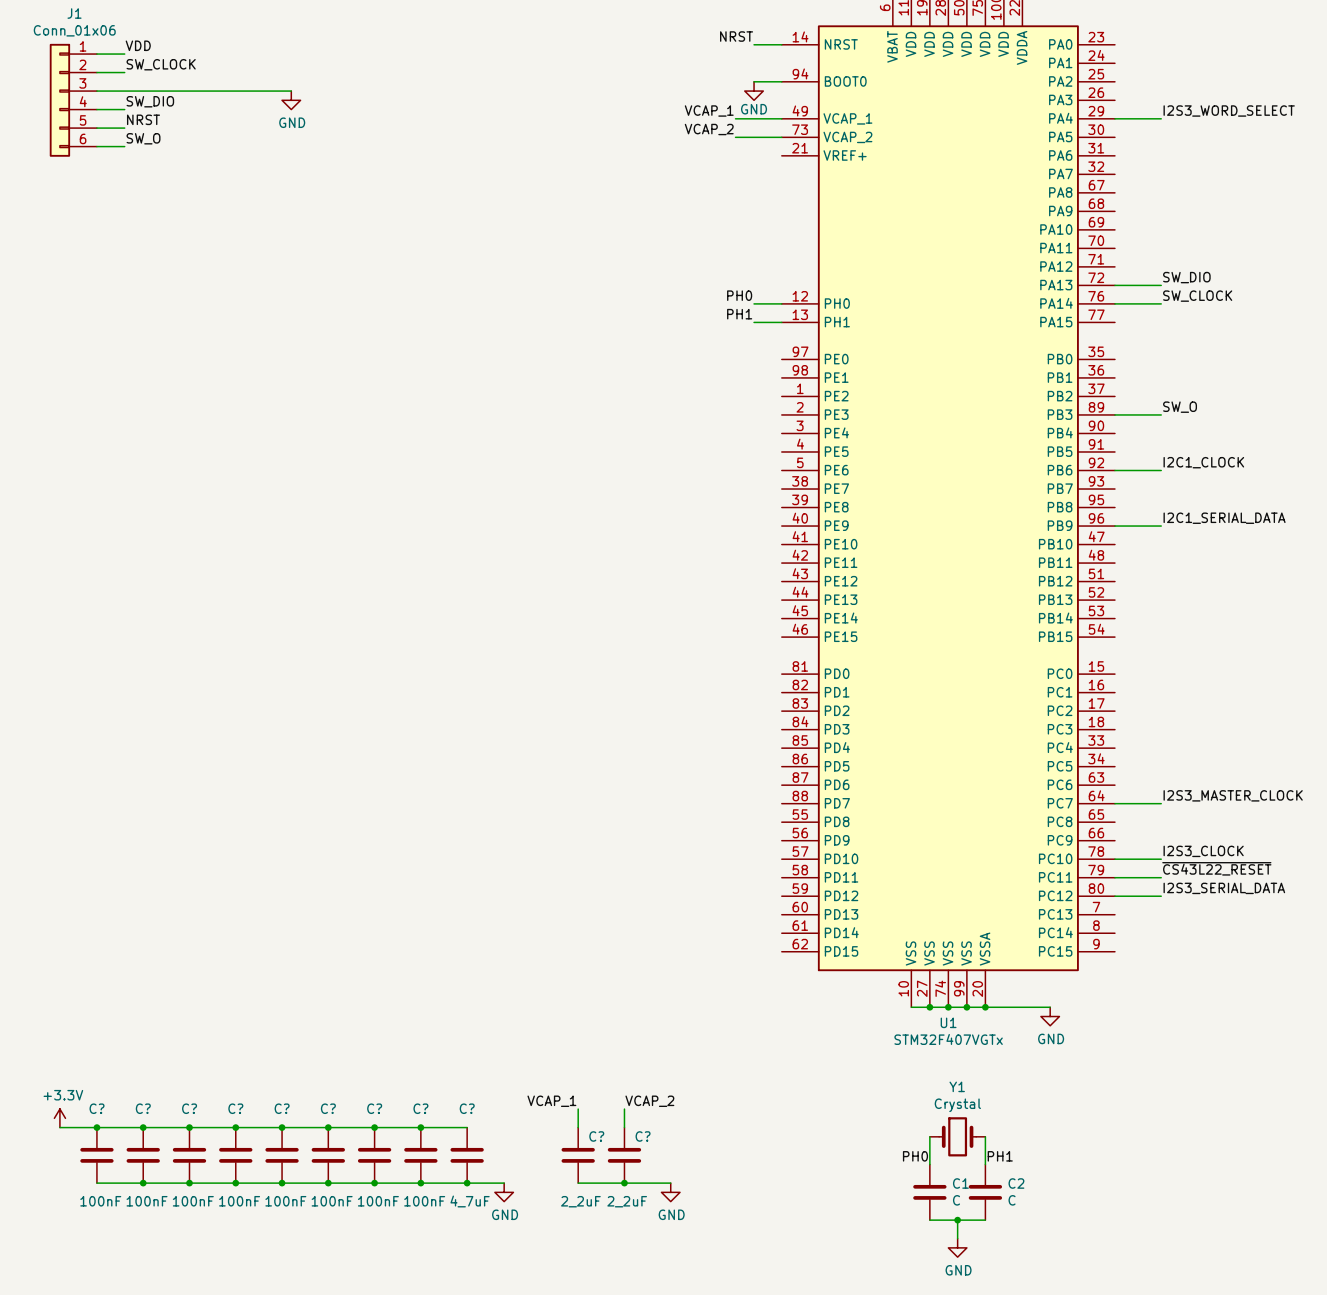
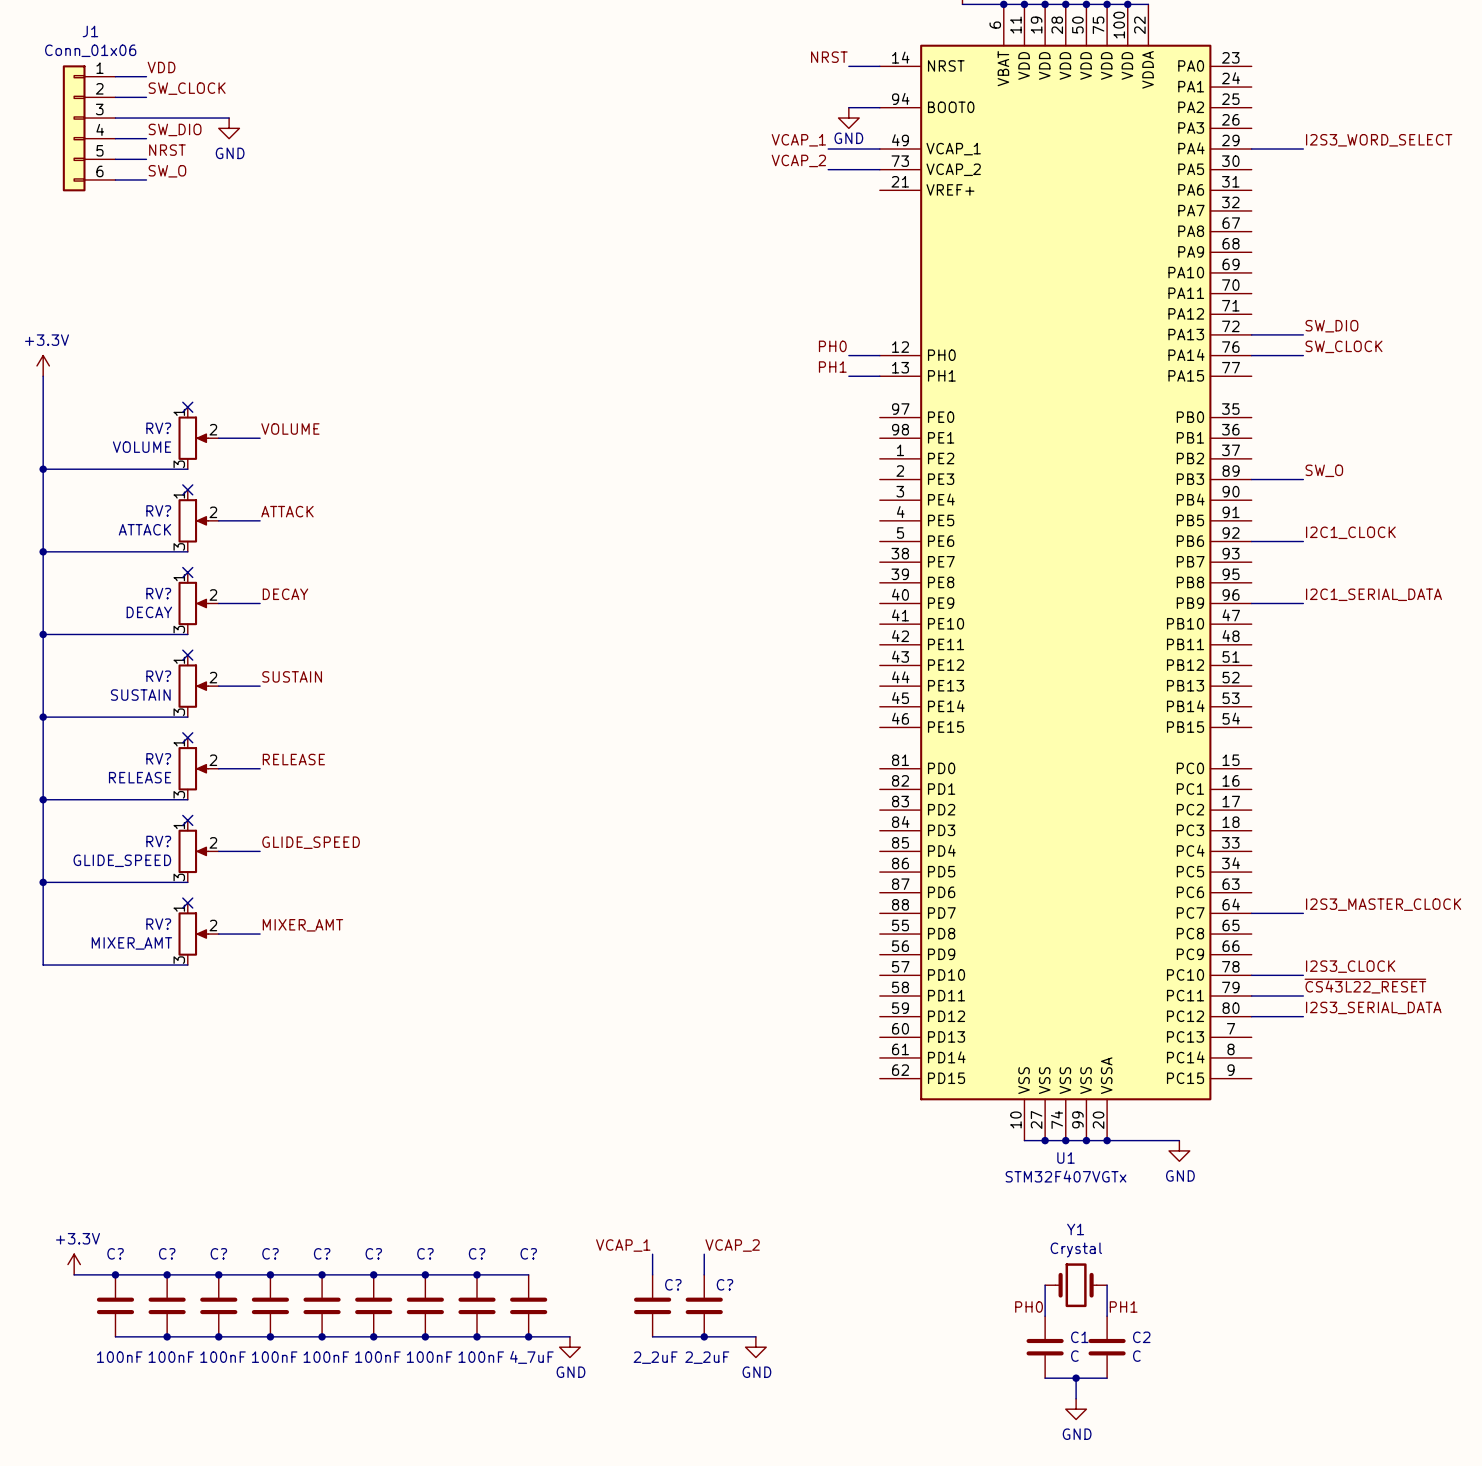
wire: (198, 91) (291, 91) -> none
power symbol position: GND (291, 100) -> GND (229, 128)
power symbol: none -> +3.3V (43, 365)
wire: none -> (43, 376) (43, 965) (187, 965)
no-connect mark: none -> (187, 407)
label: none -> VOLUME (290, 429)
RV?: none -> VOLUME (198, 438)
wire: none -> (218, 438) (260, 438)
wire: none -> (43, 469) (187, 469)
junction: none -> (43, 469)
no-connect mark: none -> (187, 489)
label: none -> ATTACK (287, 511)
RV?: none -> ATTACK (198, 520)
wire: none -> (218, 520) (260, 520)
wire: none -> (43, 551) (187, 551)
junction: none -> (43, 551)
no-connect mark: none -> (187, 572)
label: none -> DECAY (285, 594)
RV?: none -> DECAY (198, 603)
wire: none -> (218, 603) (260, 603)
wire: none -> (43, 634) (187, 634)
junction: none -> (43, 634)
no-connect mark: none -> (187, 655)
label: none -> SUSTAIN (292, 676)
RV?: none -> SUSTAIN (198, 686)
wire: none -> (218, 686) (260, 686)
wire: none -> (43, 717) (187, 717)
junction: none -> (43, 717)
no-connect mark: none -> (187, 737)
label: none -> RELEASE (293, 759)
RV?: none -> RELEASE (198, 768)
wire: none -> (218, 768) (260, 768)
wire: none -> (43, 799) (187, 799)
junction: none -> (43, 799)
no-connect mark: none -> (187, 820)
label: none -> GLIDE_SPEED (311, 842)
RV?: none -> GLIDE_SPEED (198, 851)
wire: none -> (218, 851) (260, 851)
wire: none -> (43, 882) (187, 882)
junction: none -> (43, 882)
no-connect mark: none -> (187, 903)
label: none -> MIXER_AMT (302, 925)
RV?: none -> MIXER_AMT (198, 934)
wire: none -> (218, 934) (260, 934)

